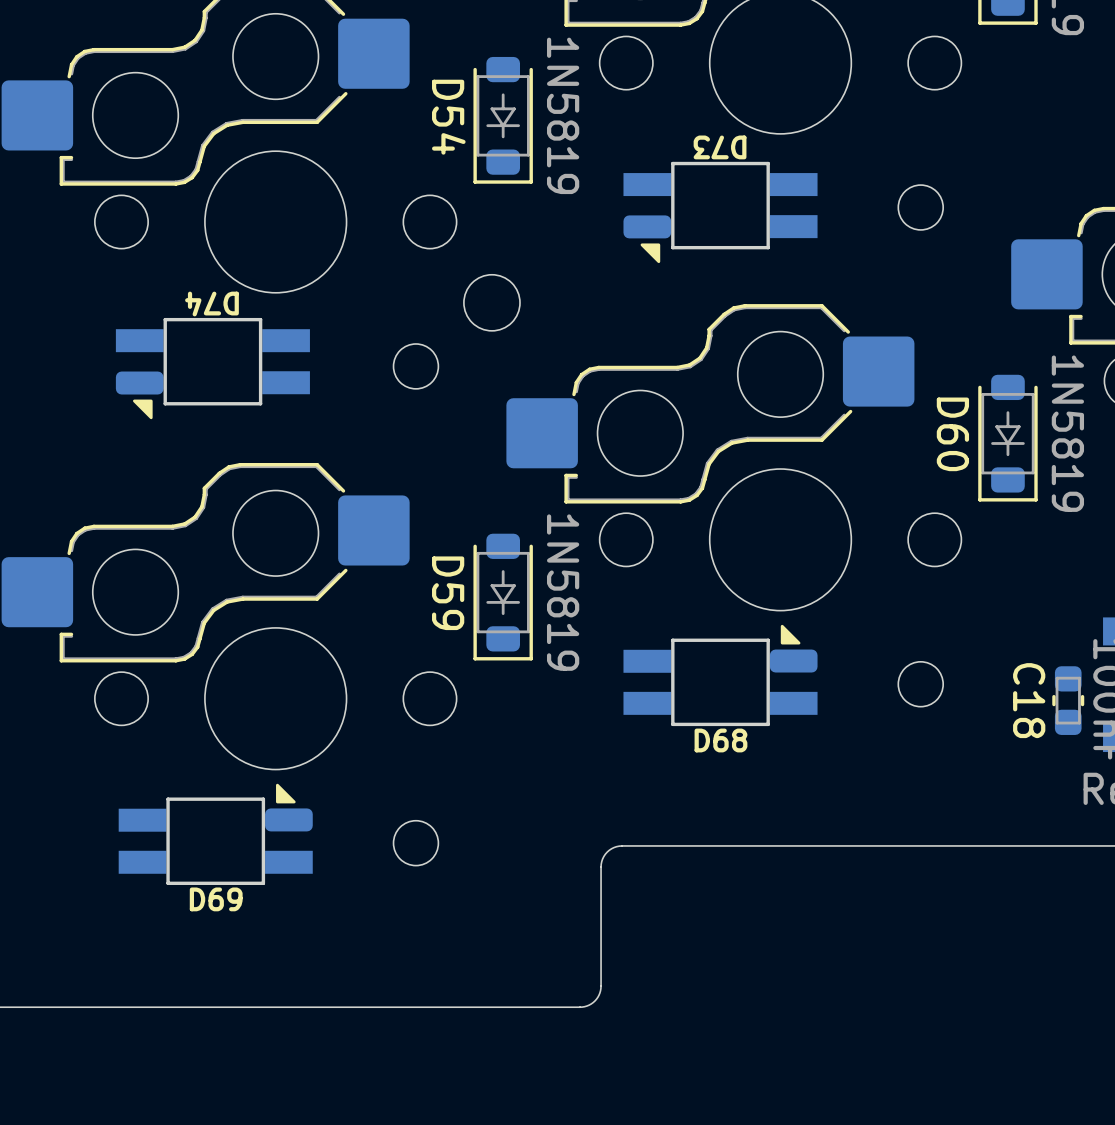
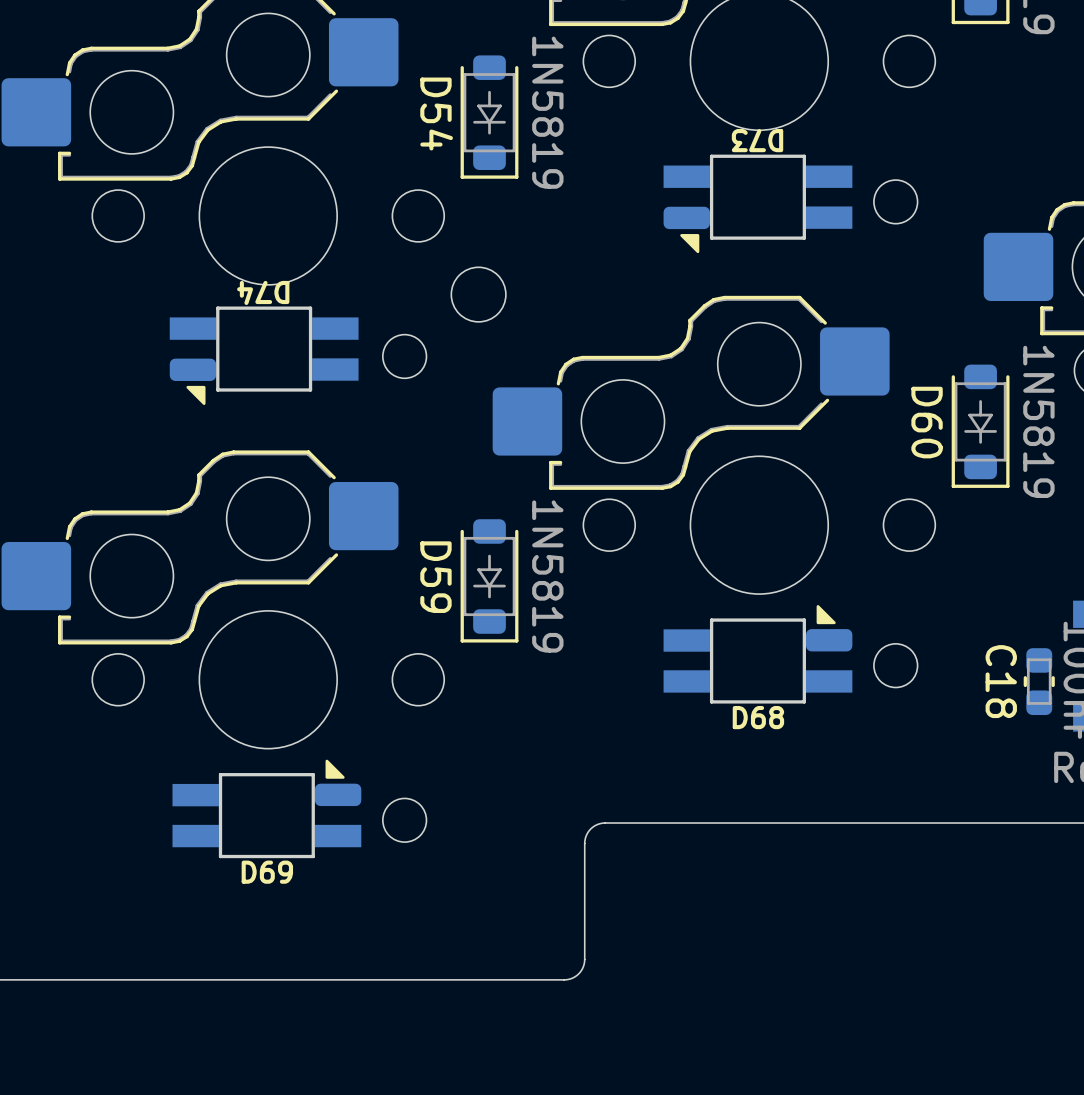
D73 position: (720, 212) -> (757, 203)
D74 position: (212, 368) -> (264, 355)
D68 position: (720, 675) -> (757, 654)
D69 position: (215, 834) -> (266, 808)

